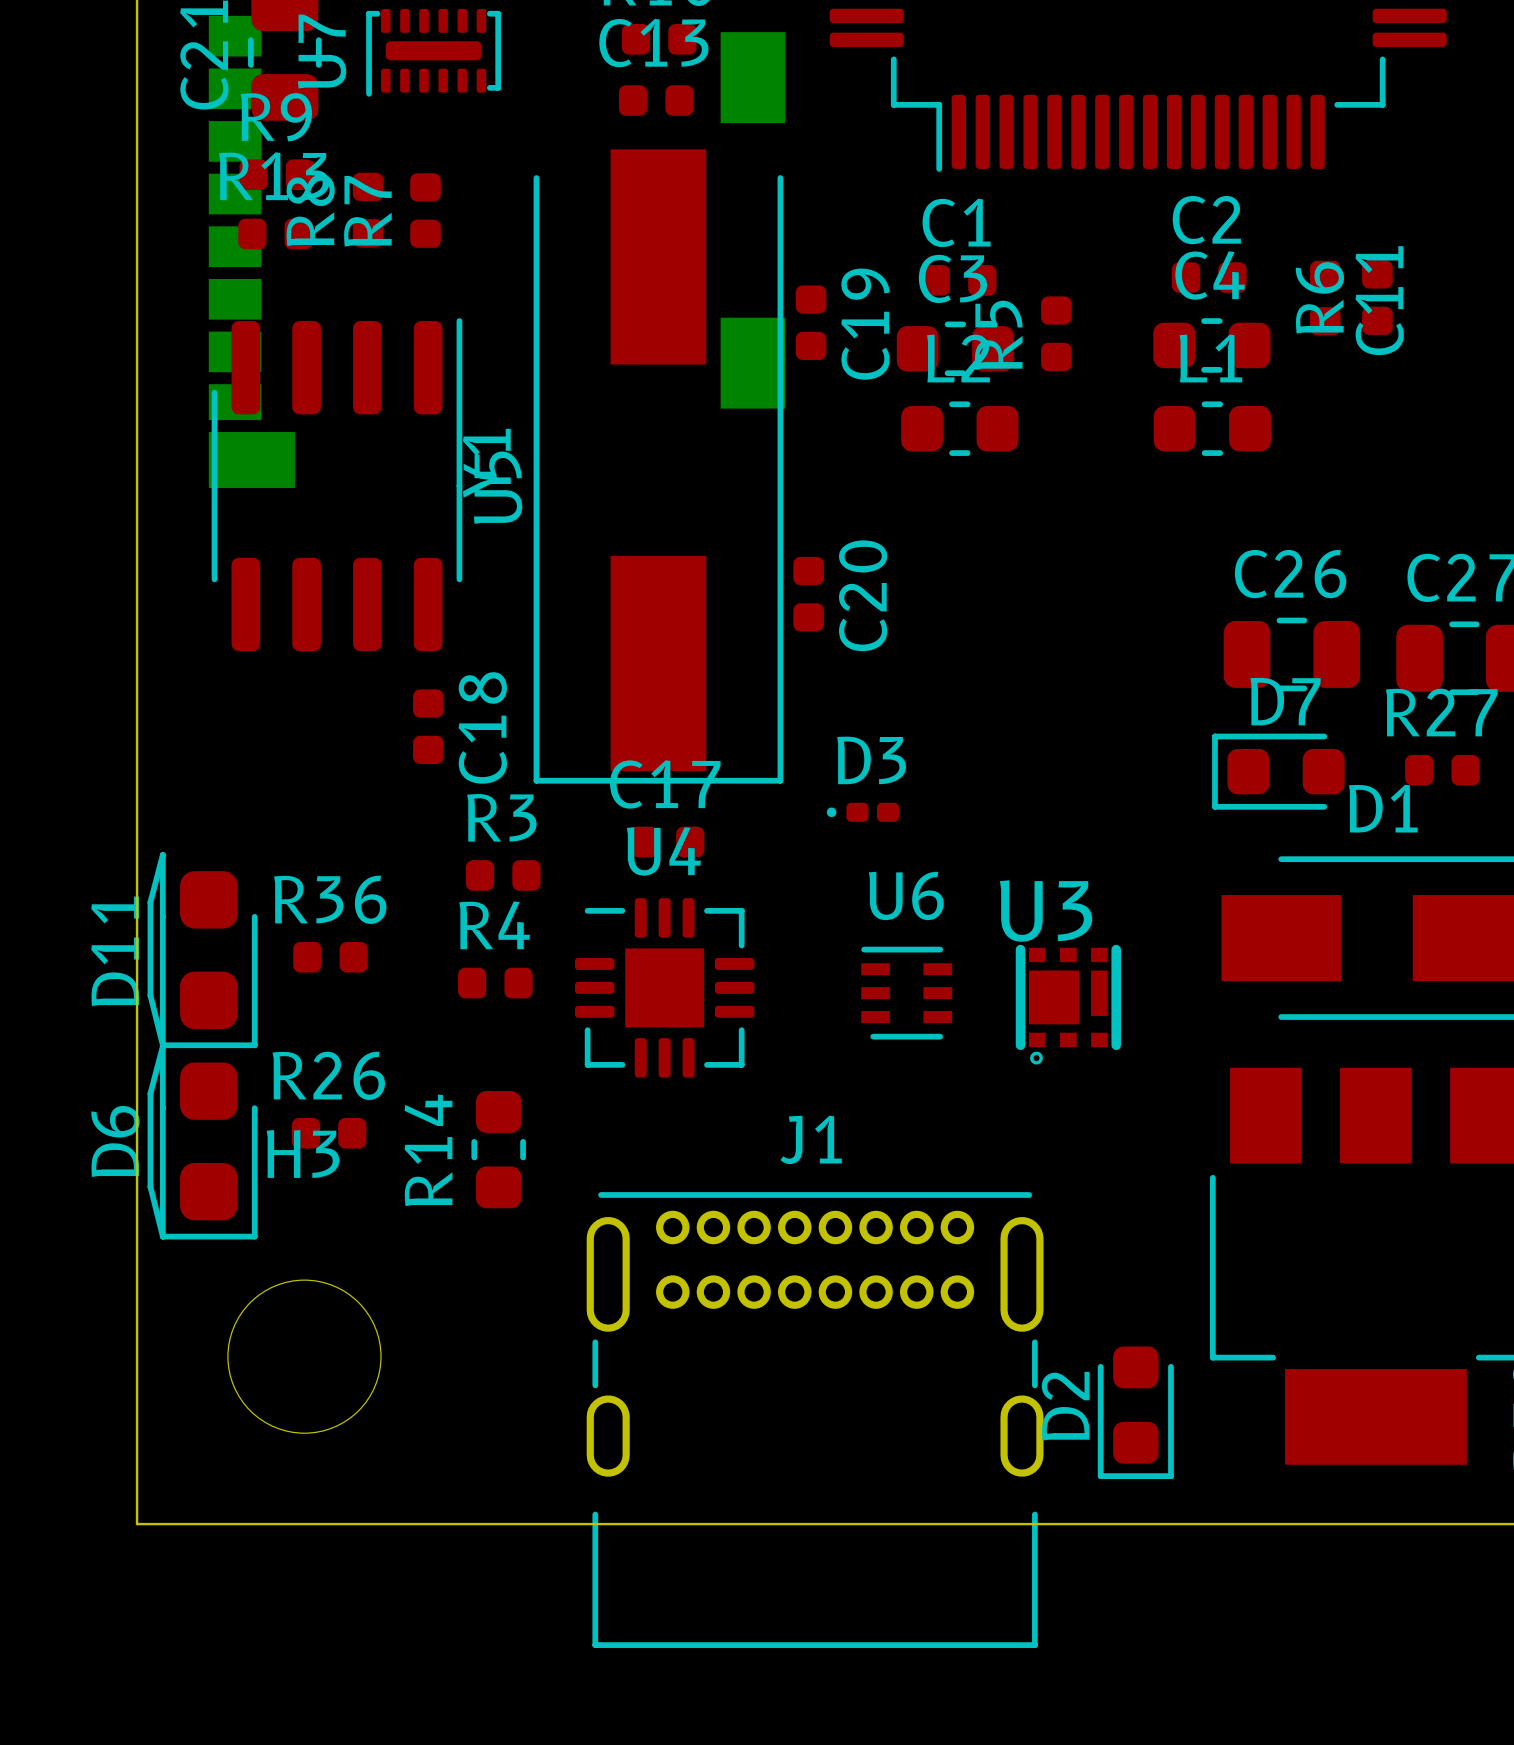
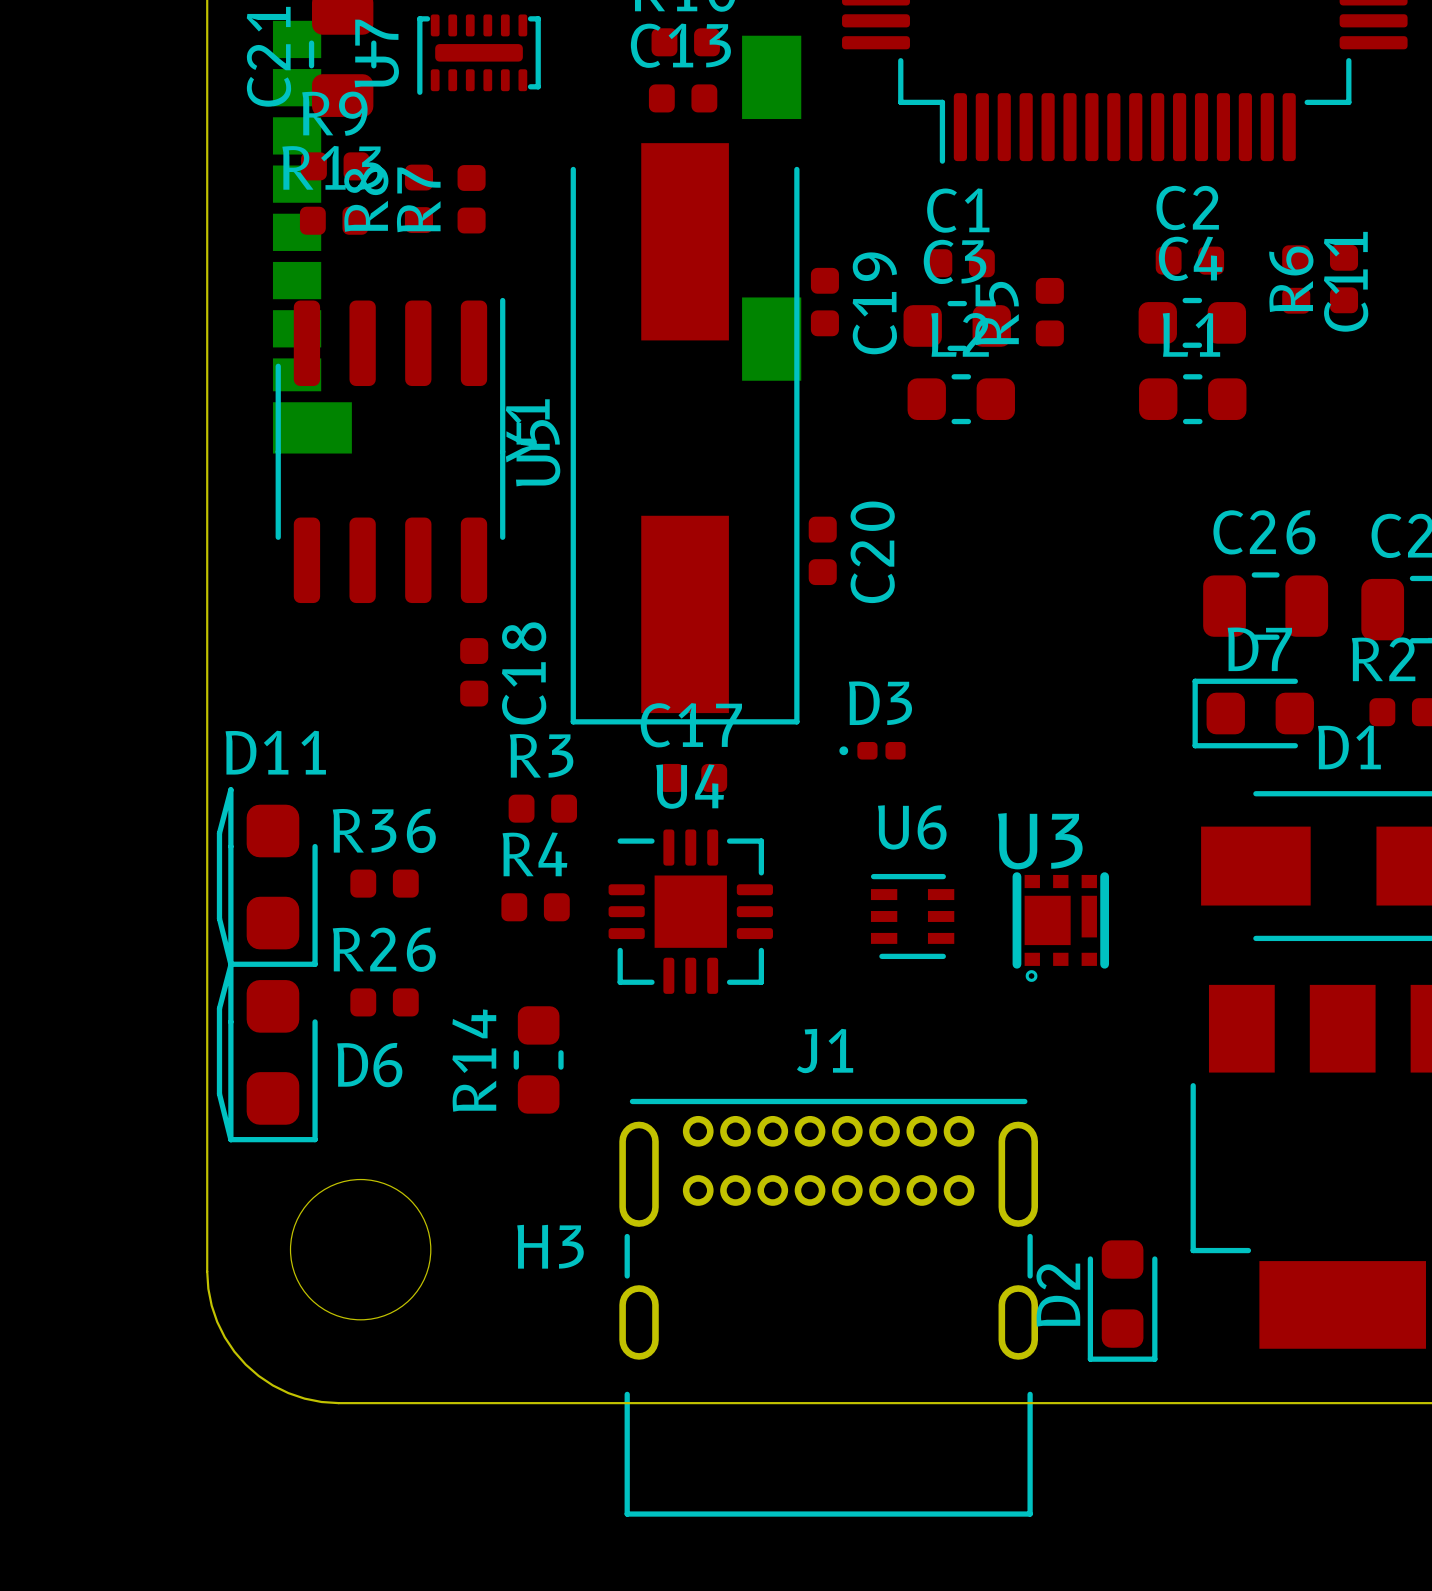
D11 name rotation: 0° (115, 951) -> 90° clockwise (275, 752)
R26 position: (329, 1133) -> (384, 1002)
D6 name rotation: 0° (115, 1141) -> 90° clockwise (369, 1065)
D6 name position: D6 (115, 1141) -> D6 (369, 1065)
H3 name position: H3 (303, 1153) -> H3 (550, 1246)
board edge: (137, 1380) (137, 1524) (280, 1524) -> (207, 1271) (211, 1305) (217, 1321) (234, 1351) (245, 1364) (272, 1385) (288, 1393) (304, 1398) (338, 1403)

